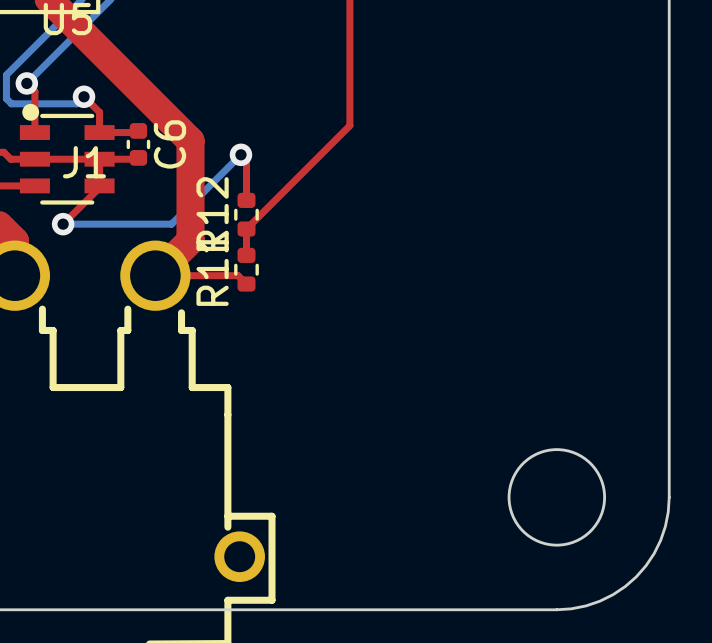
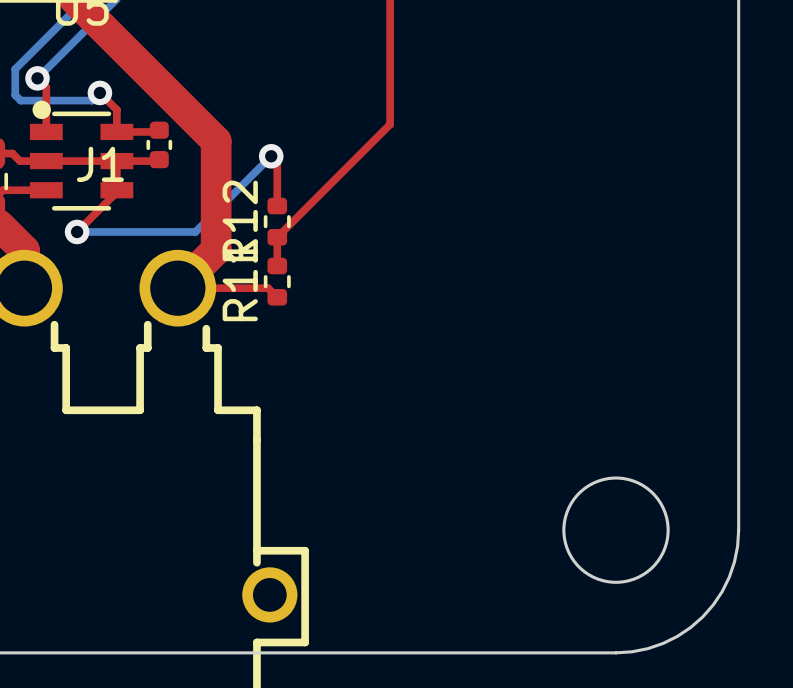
C6 name: C6 (169, 144) -> none

